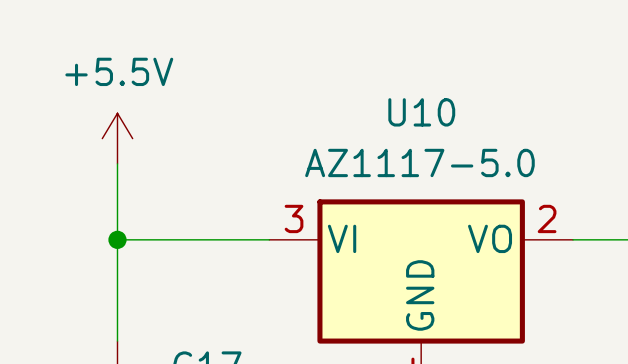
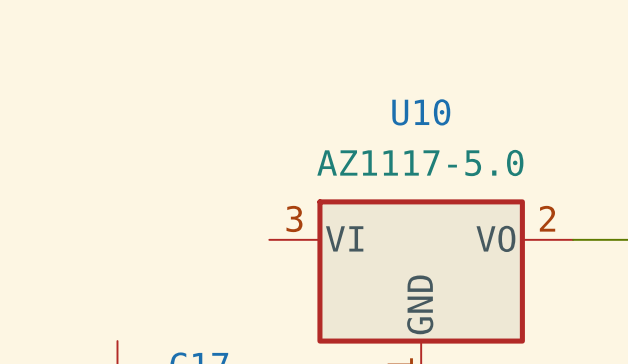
power symbol: +5.5V (117, 138) -> none
wire: (117, 163) (117, 341) -> none
wire: (117, 239) (269, 239) -> none
junction: (117, 239) -> none

